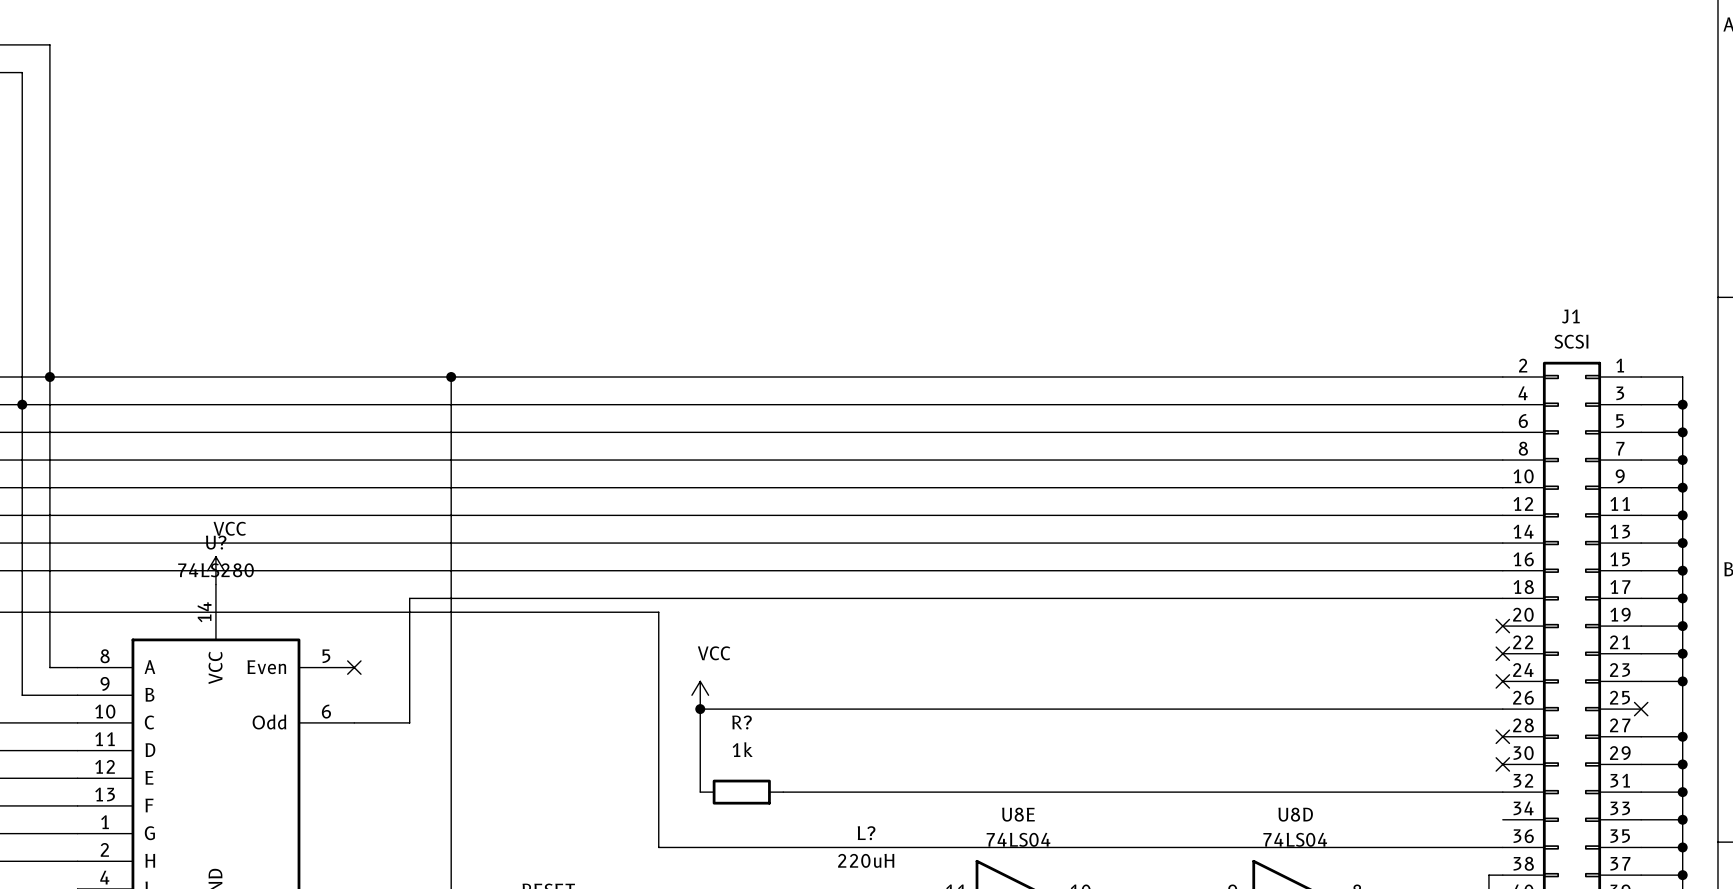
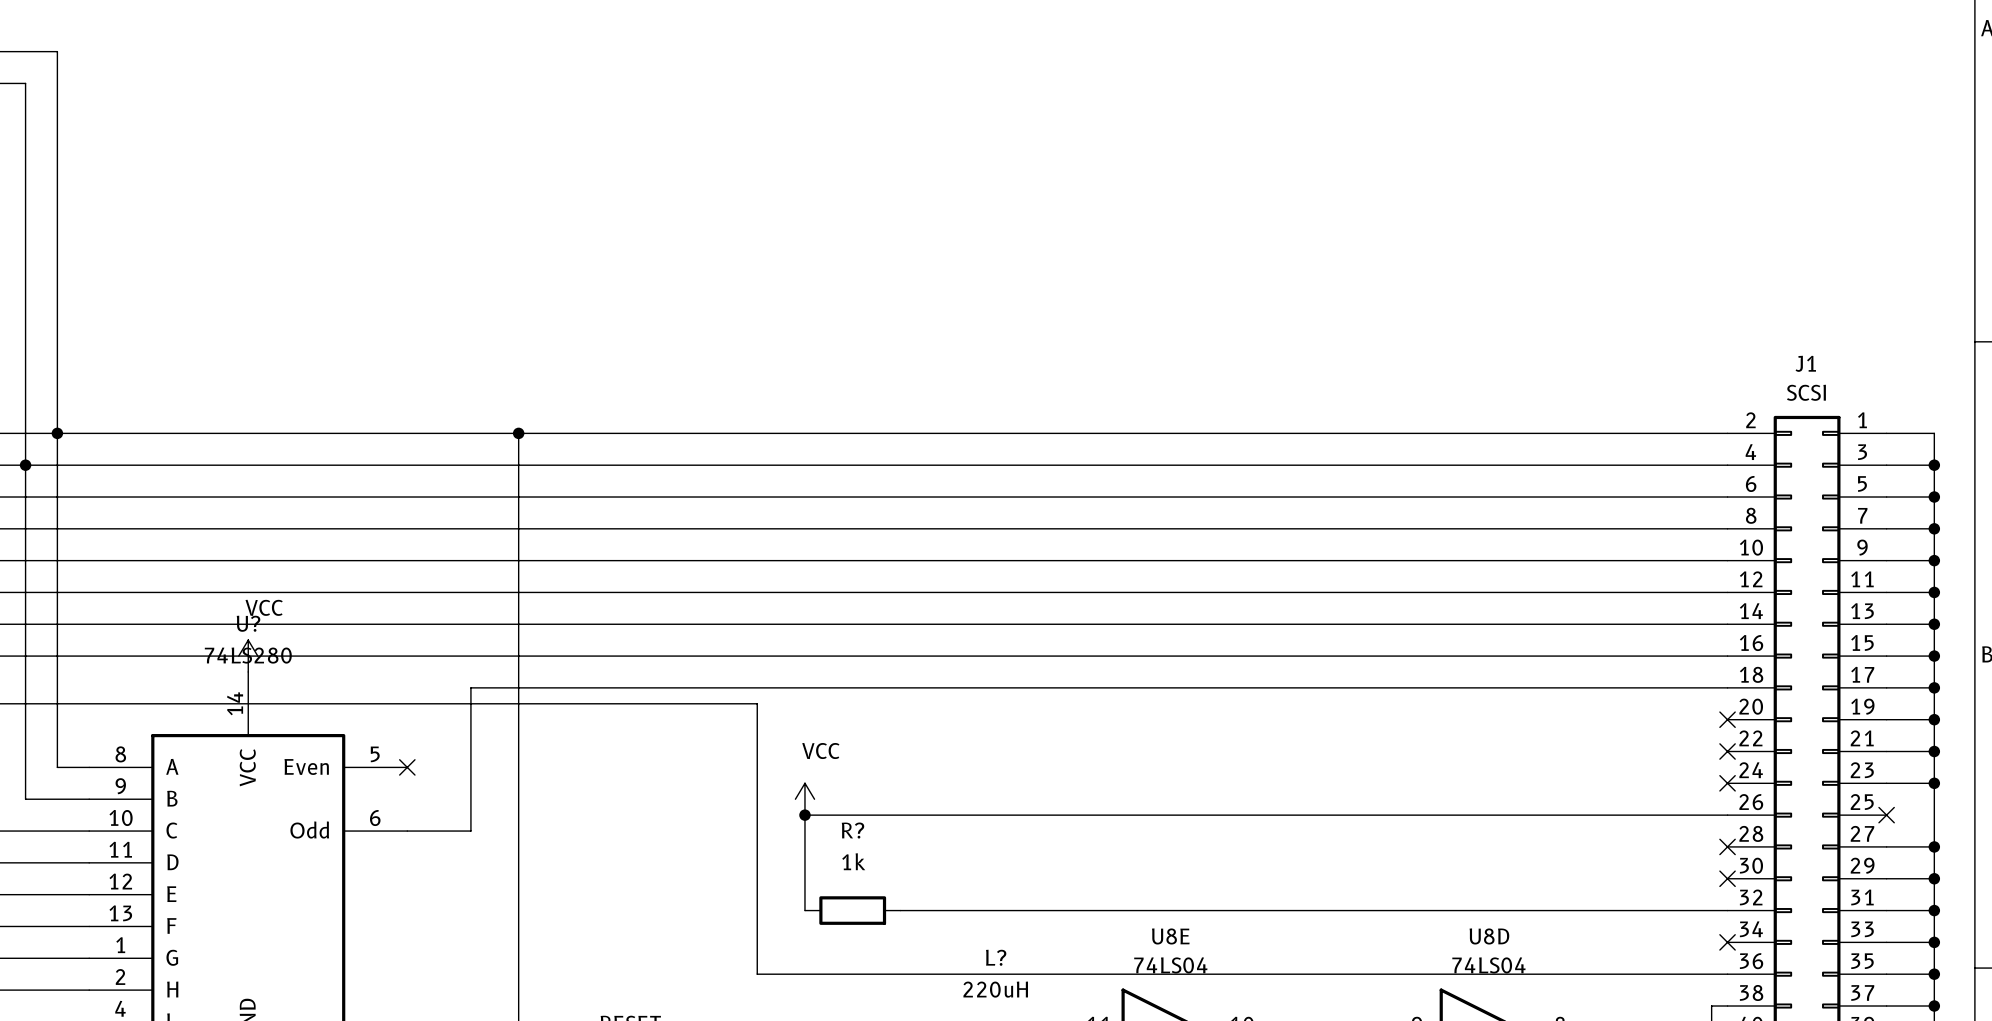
no-connect mark: none -> (1727, 942)

